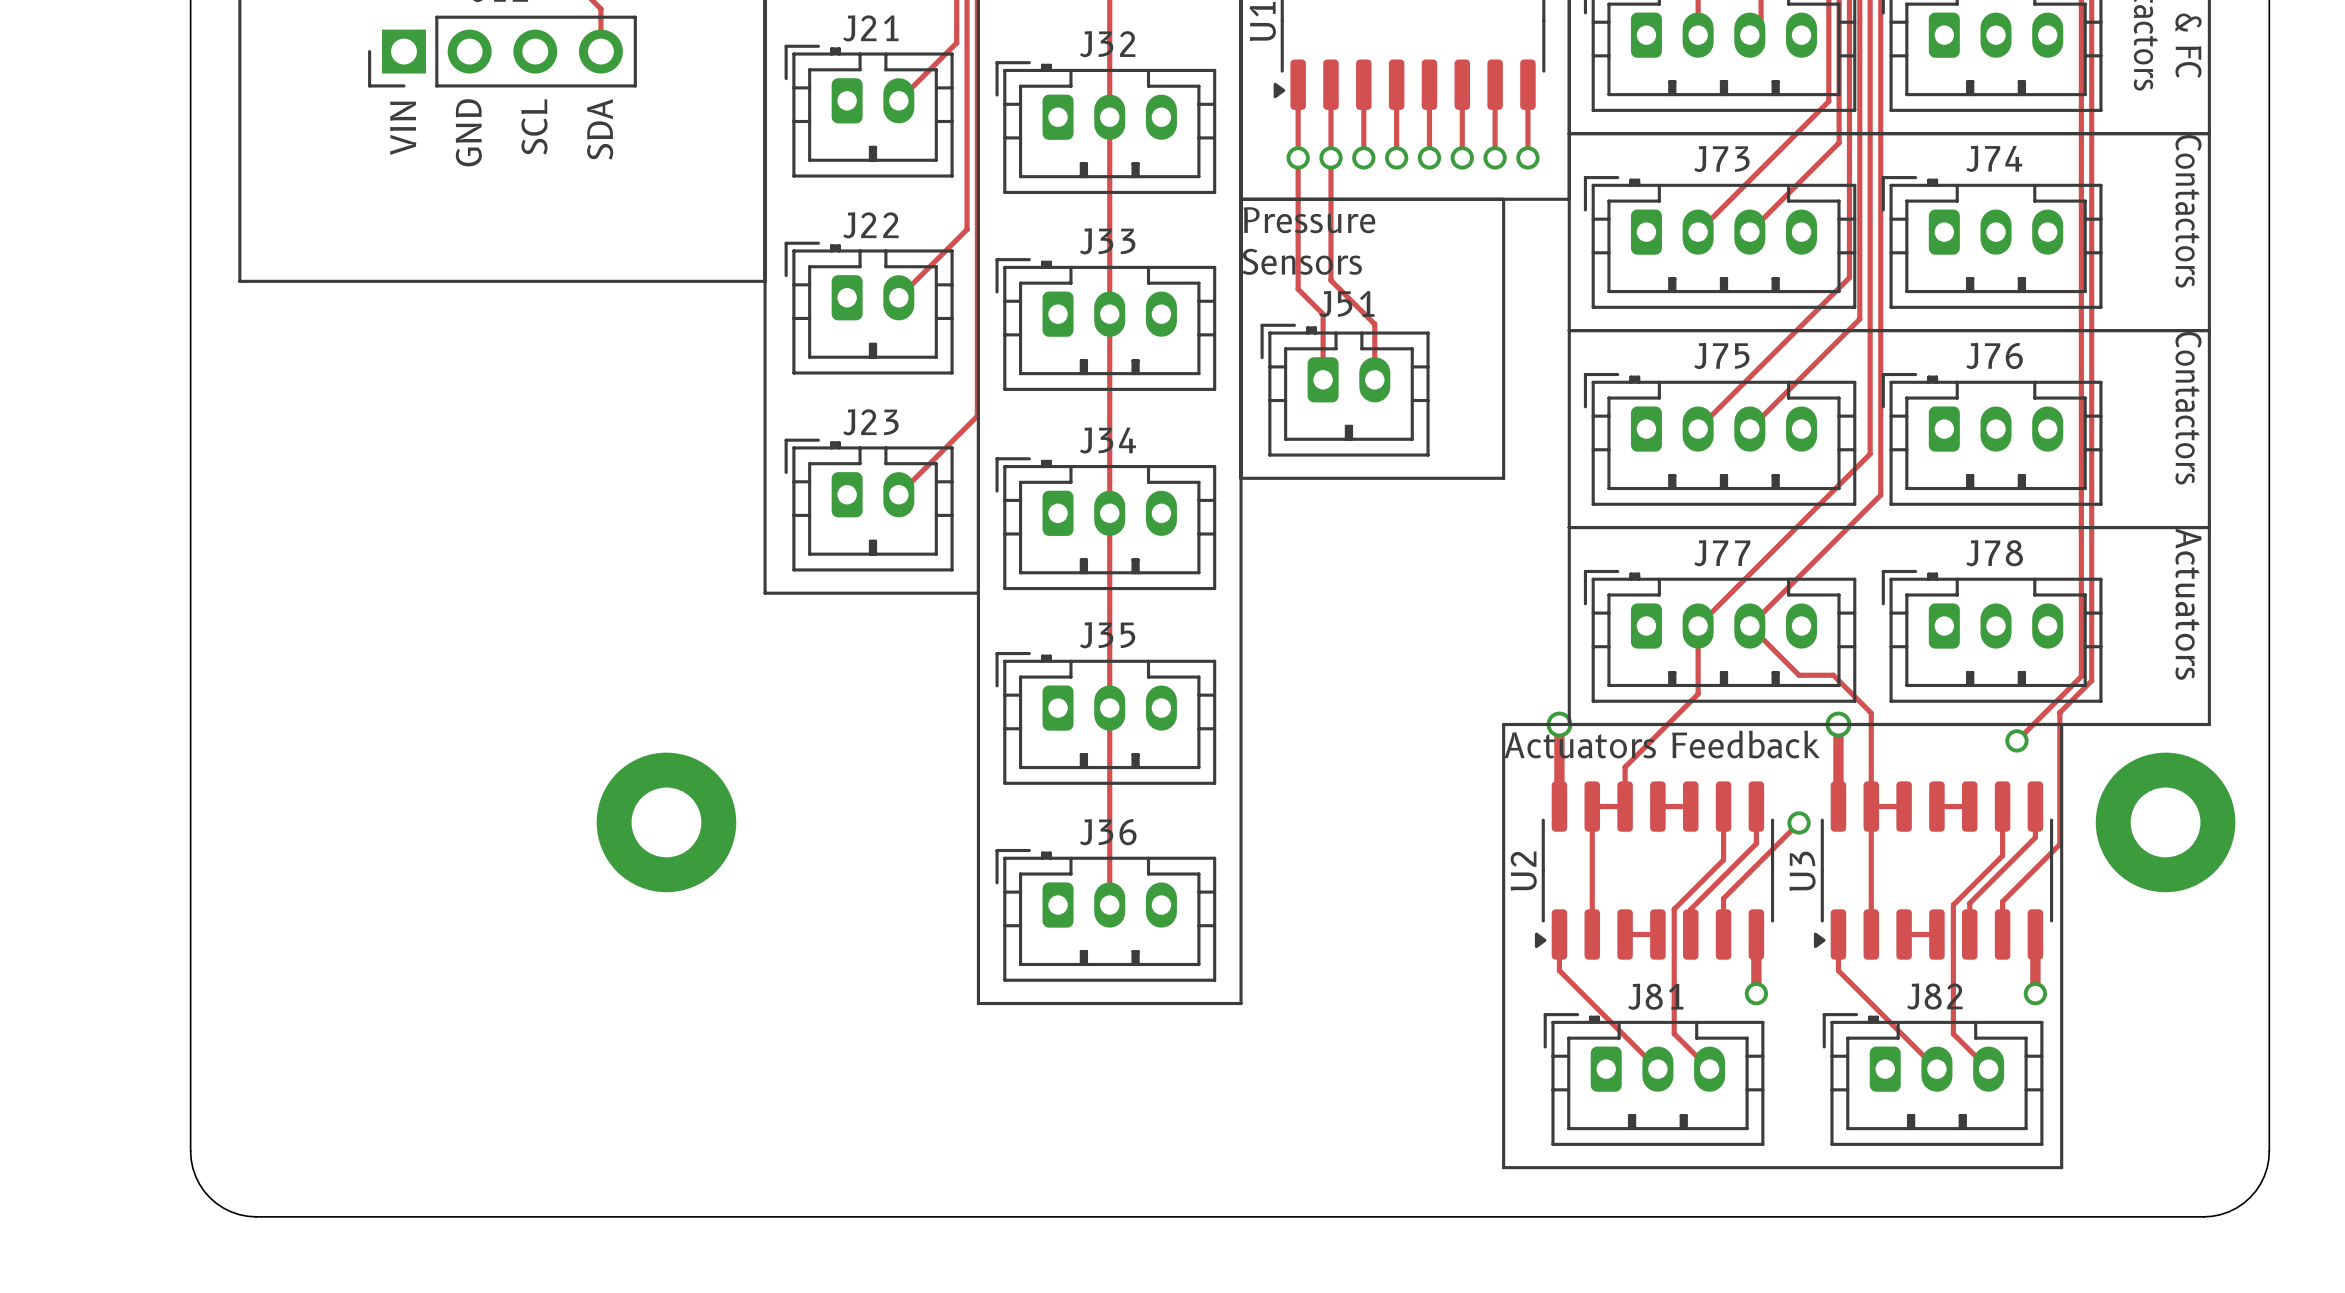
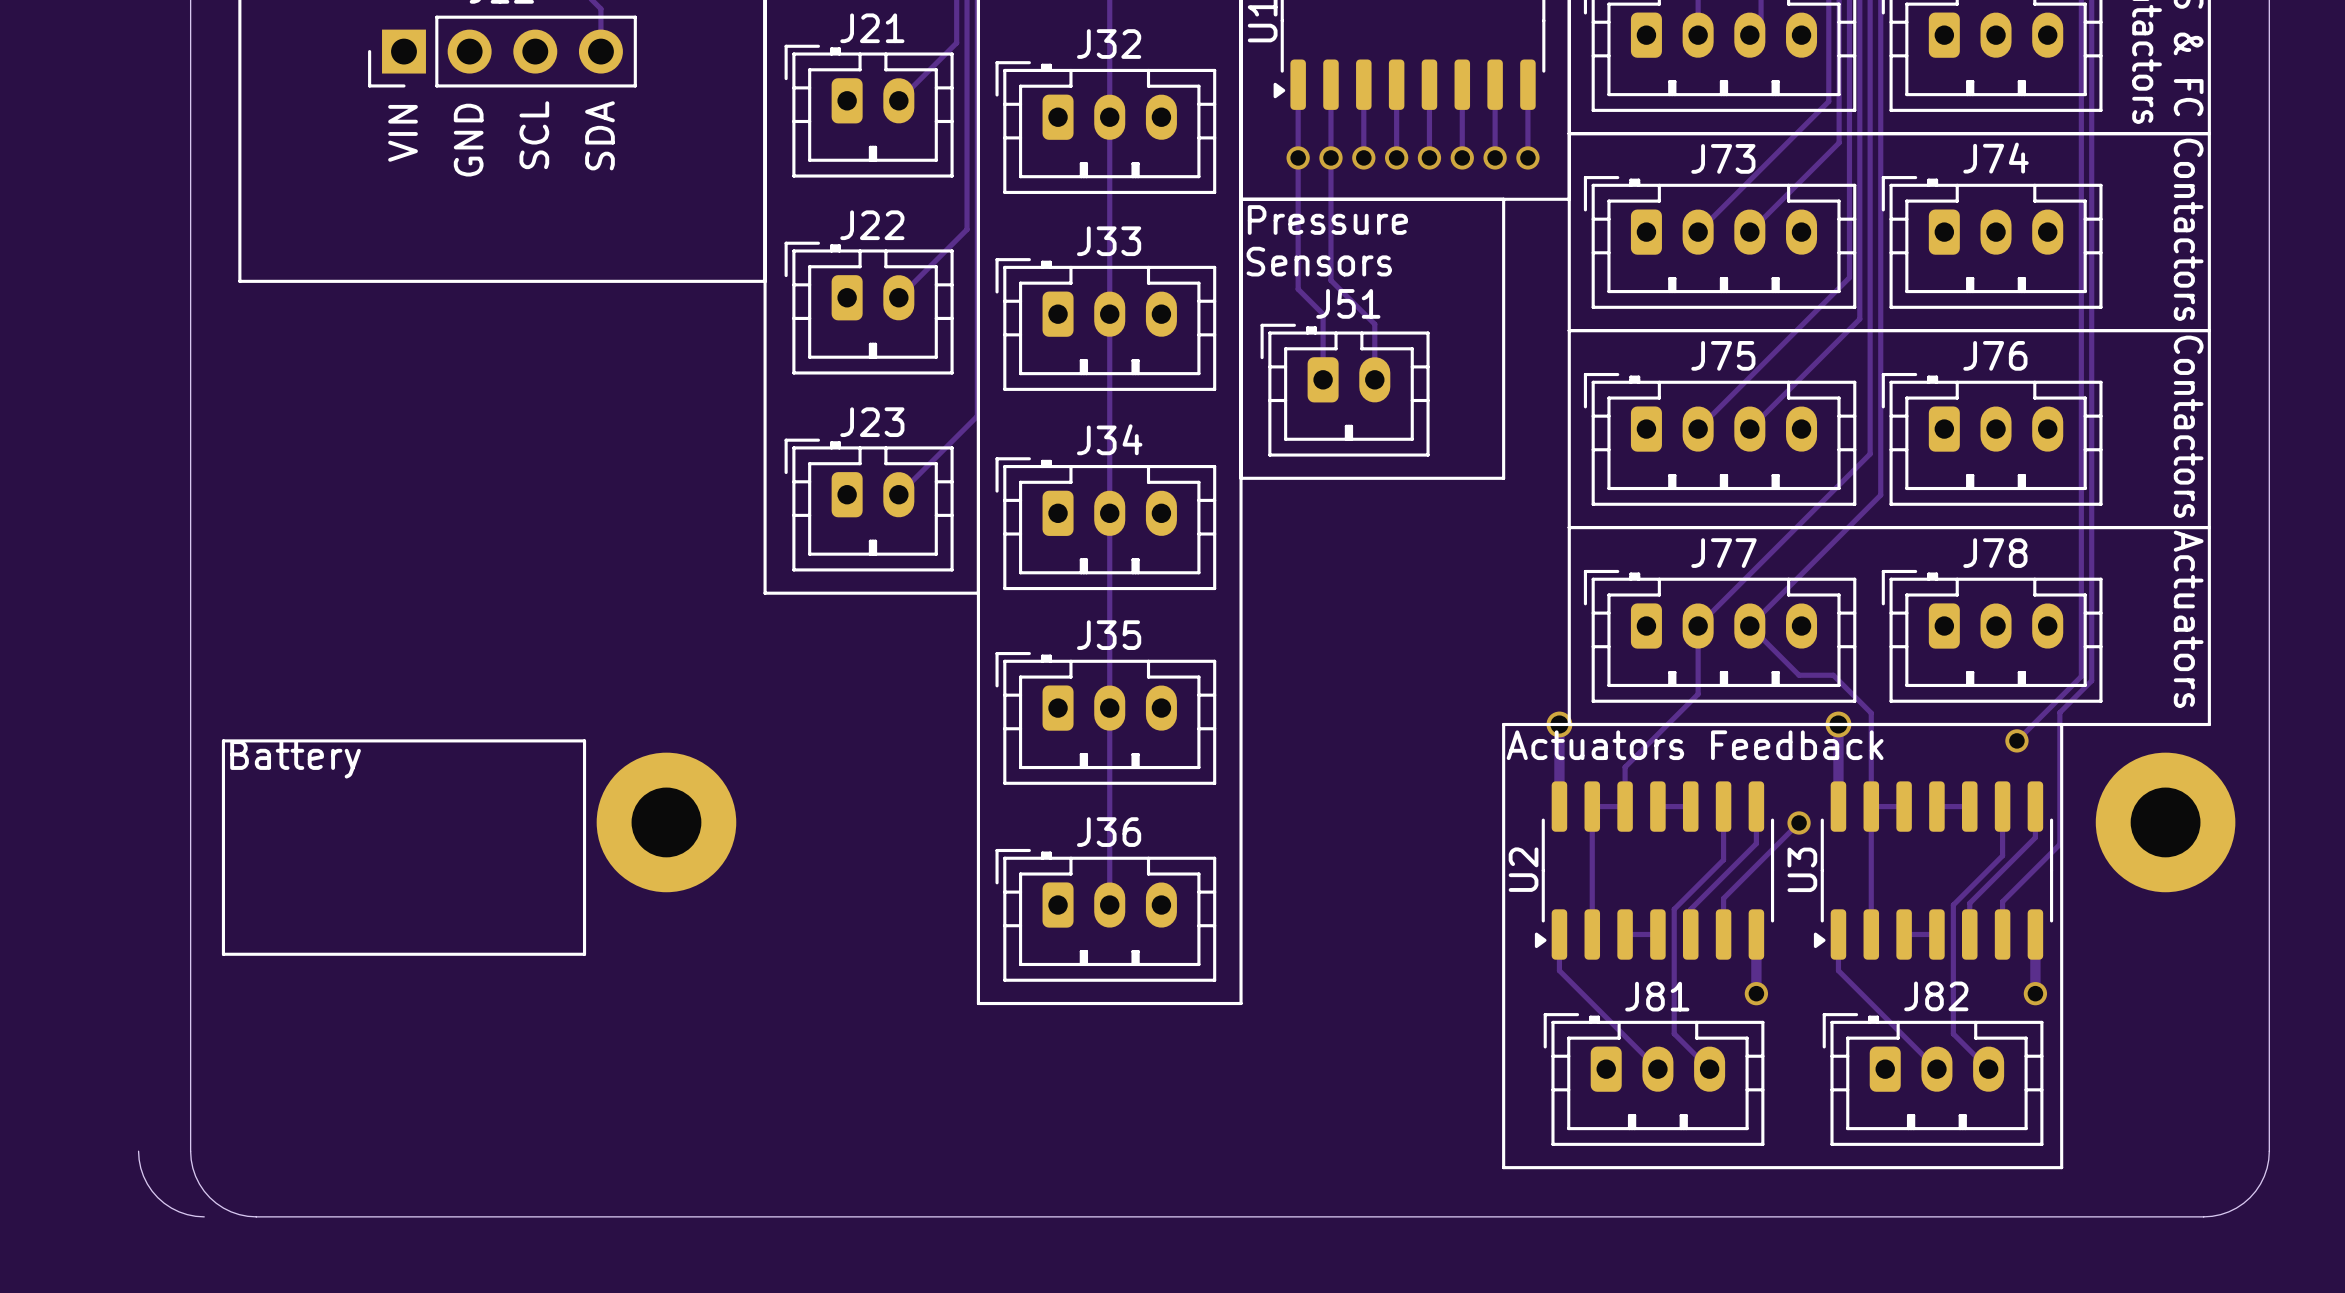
line: none -> (223, 740) (584, 740) (584, 954) (223, 954) (223, 740)
text: none -> Battery (295, 759)
board edge: none -> (138, 1151) (143, 1176) (157, 1197) (179, 1211) (204, 1216)

